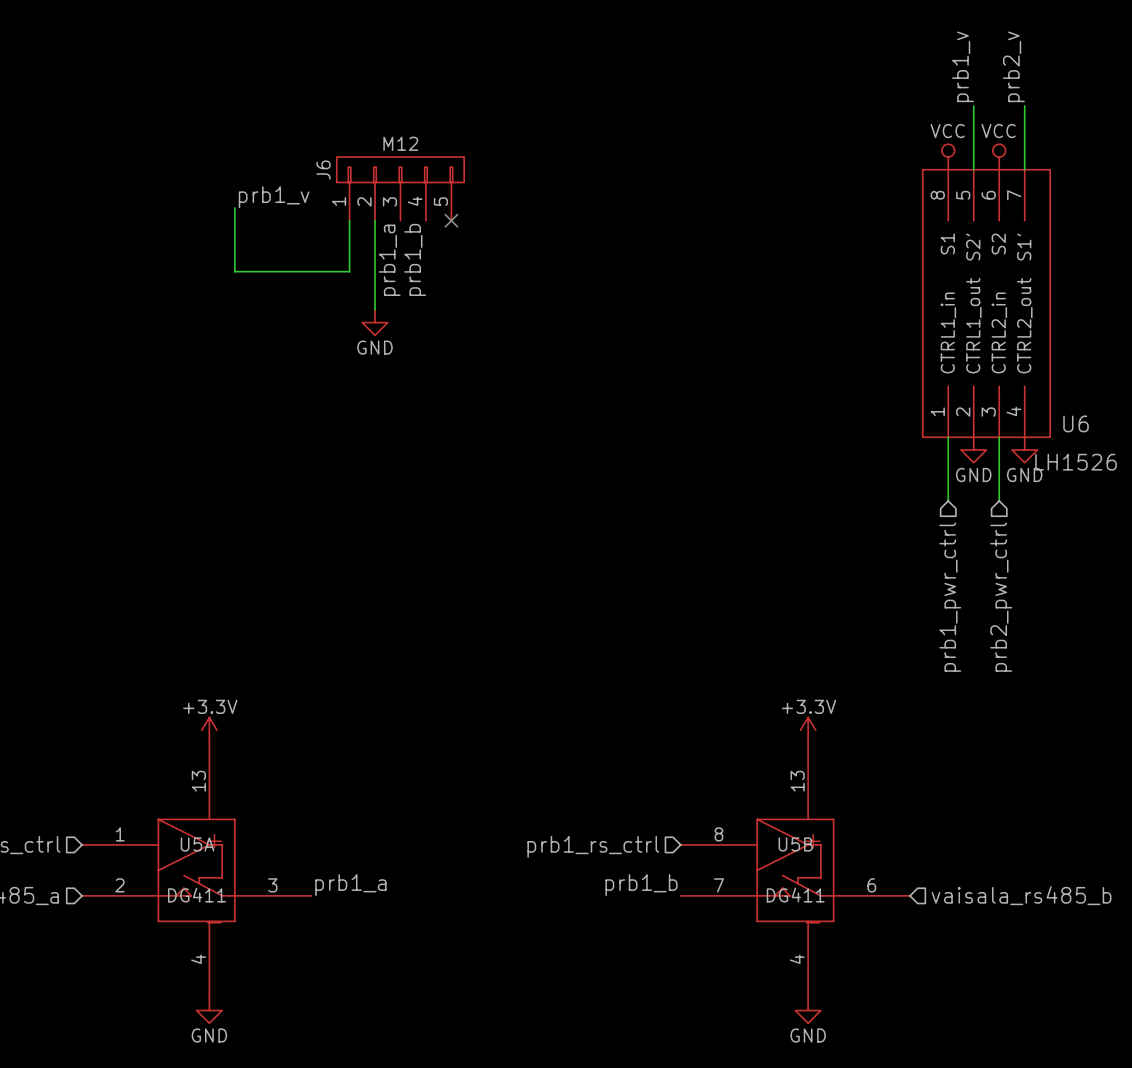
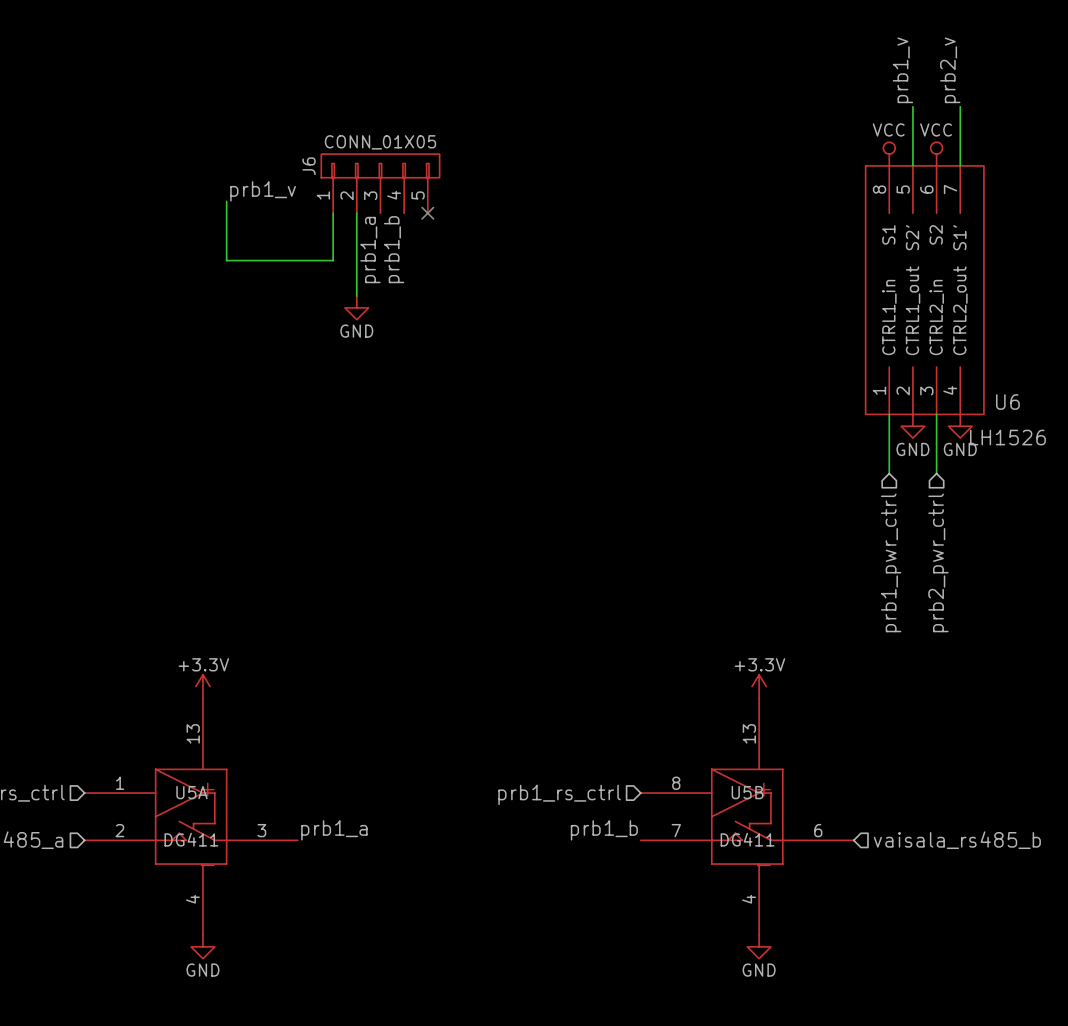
J6 value: M12 (400, 143) -> CONN_01X05 (380, 142)

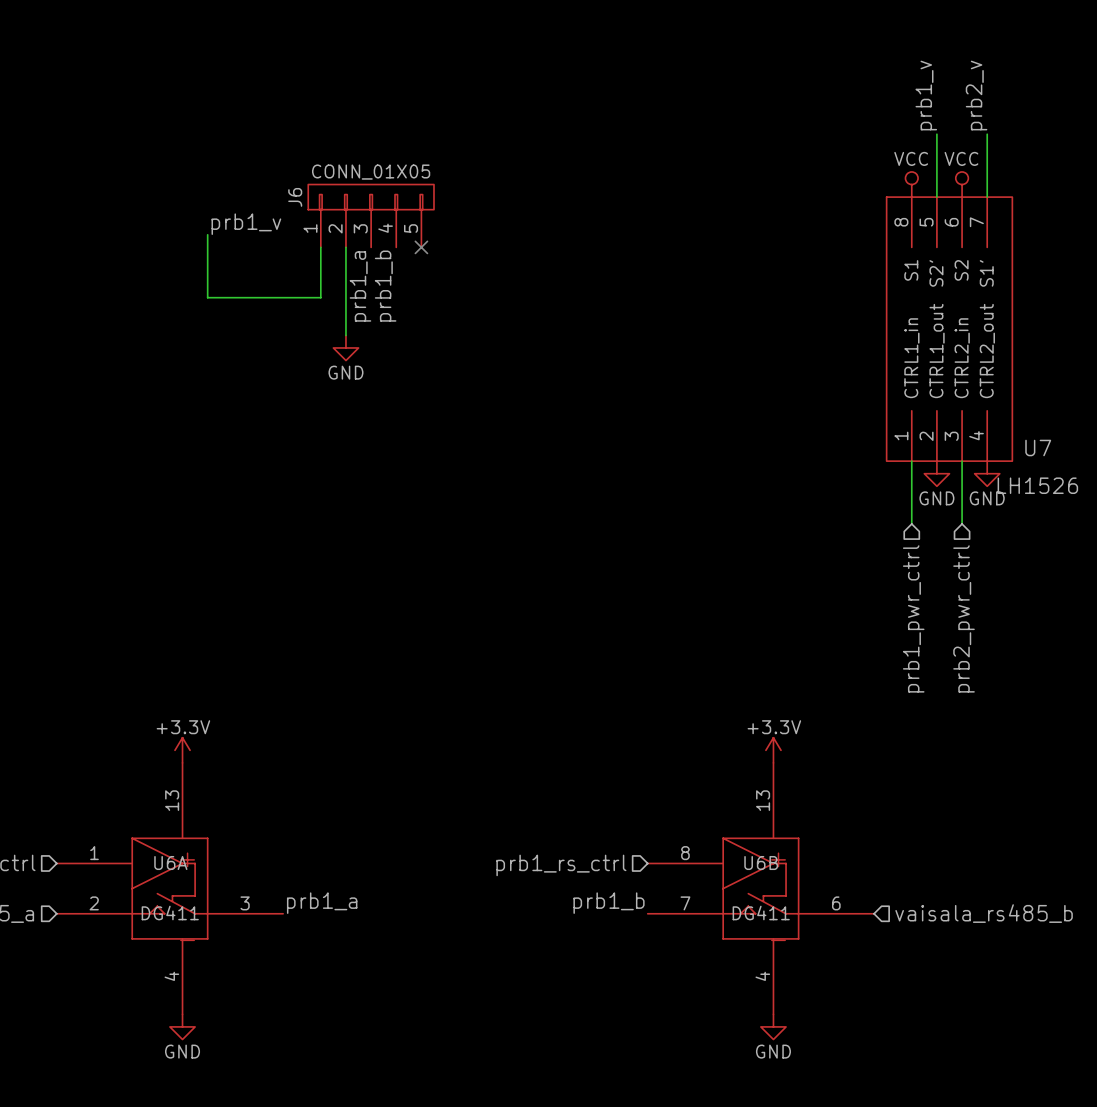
U6 name: U6 (1007, 402) -> U7 (1038, 448)
U5A name: U5A (191, 792) -> U6A (170, 863)
U5B name: U5B (747, 792) -> U6B (761, 863)

